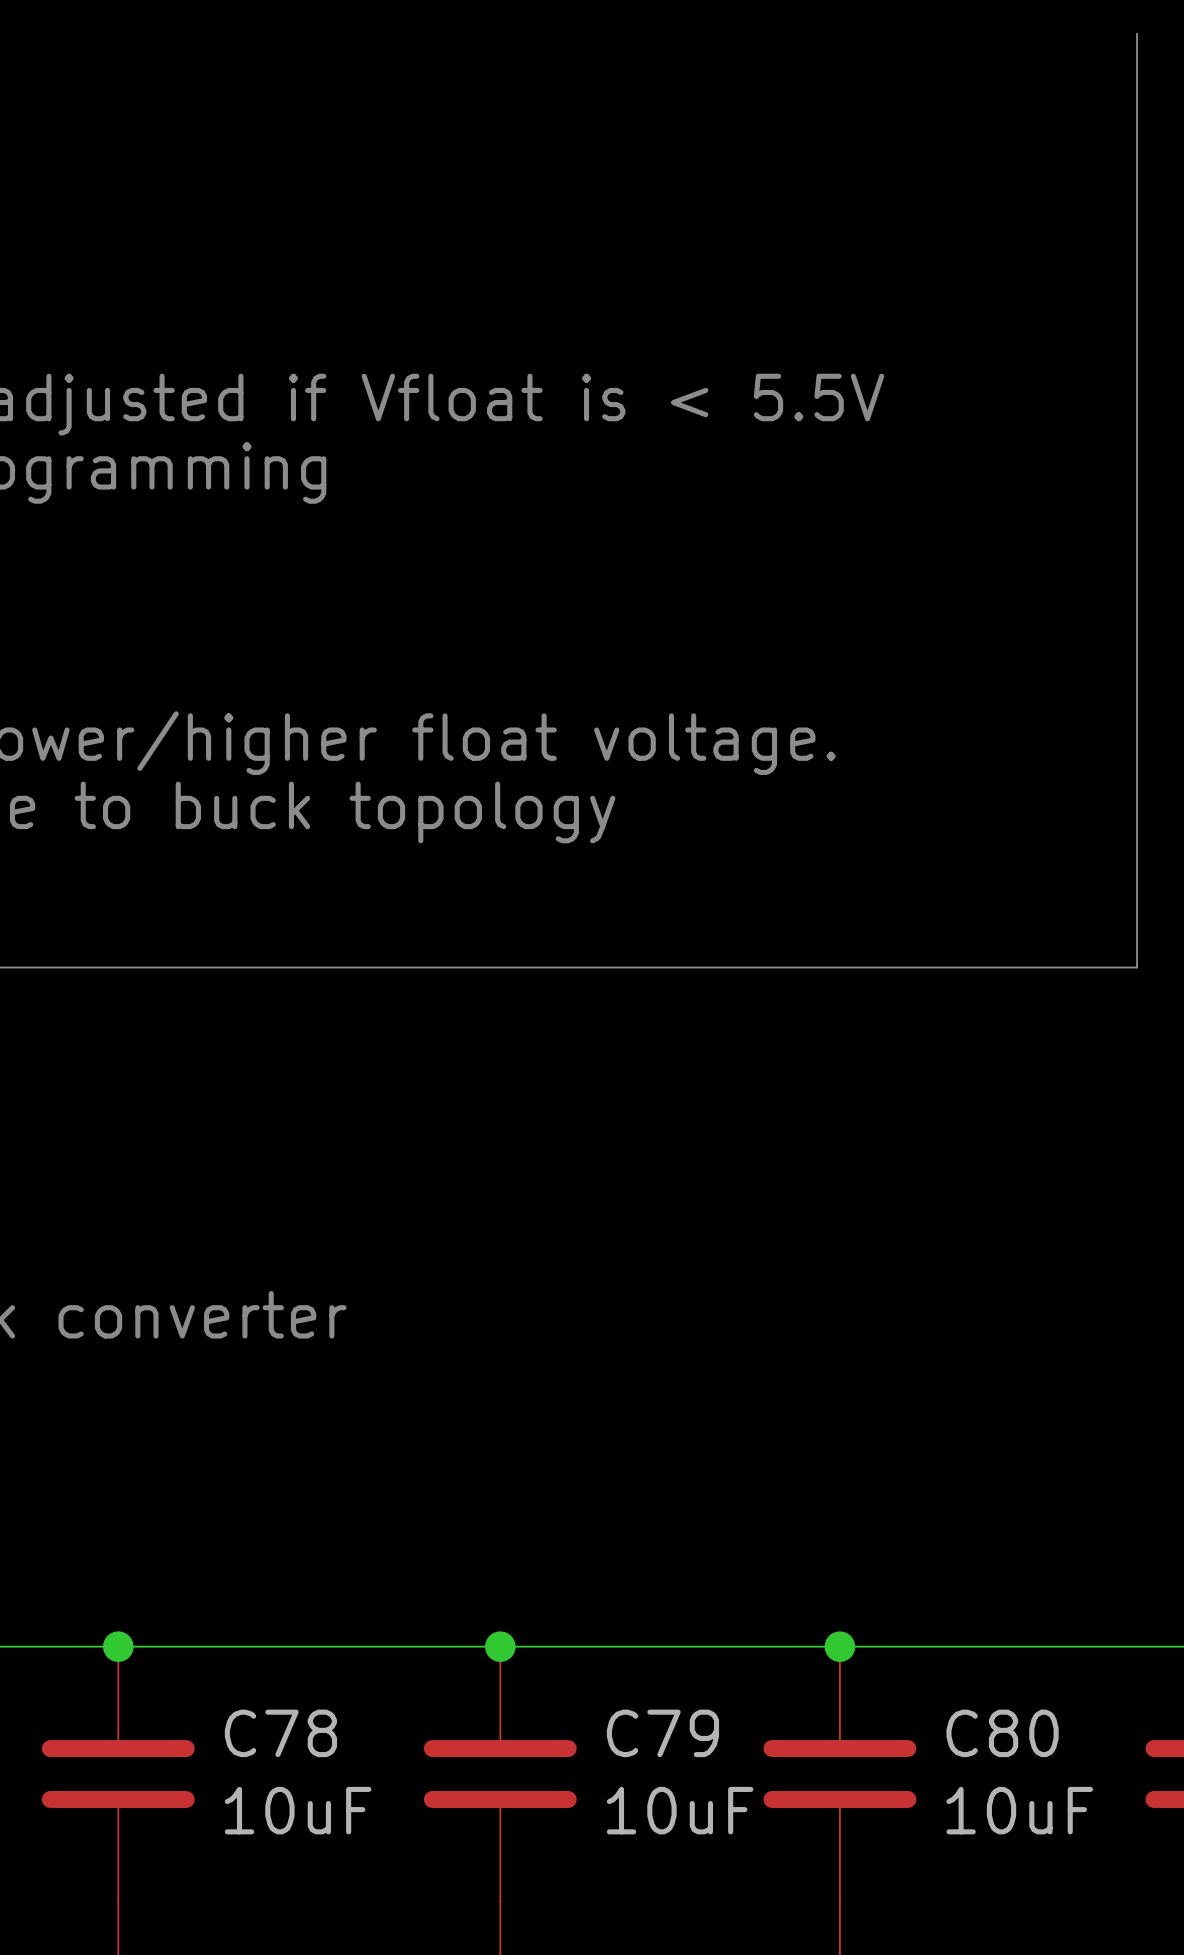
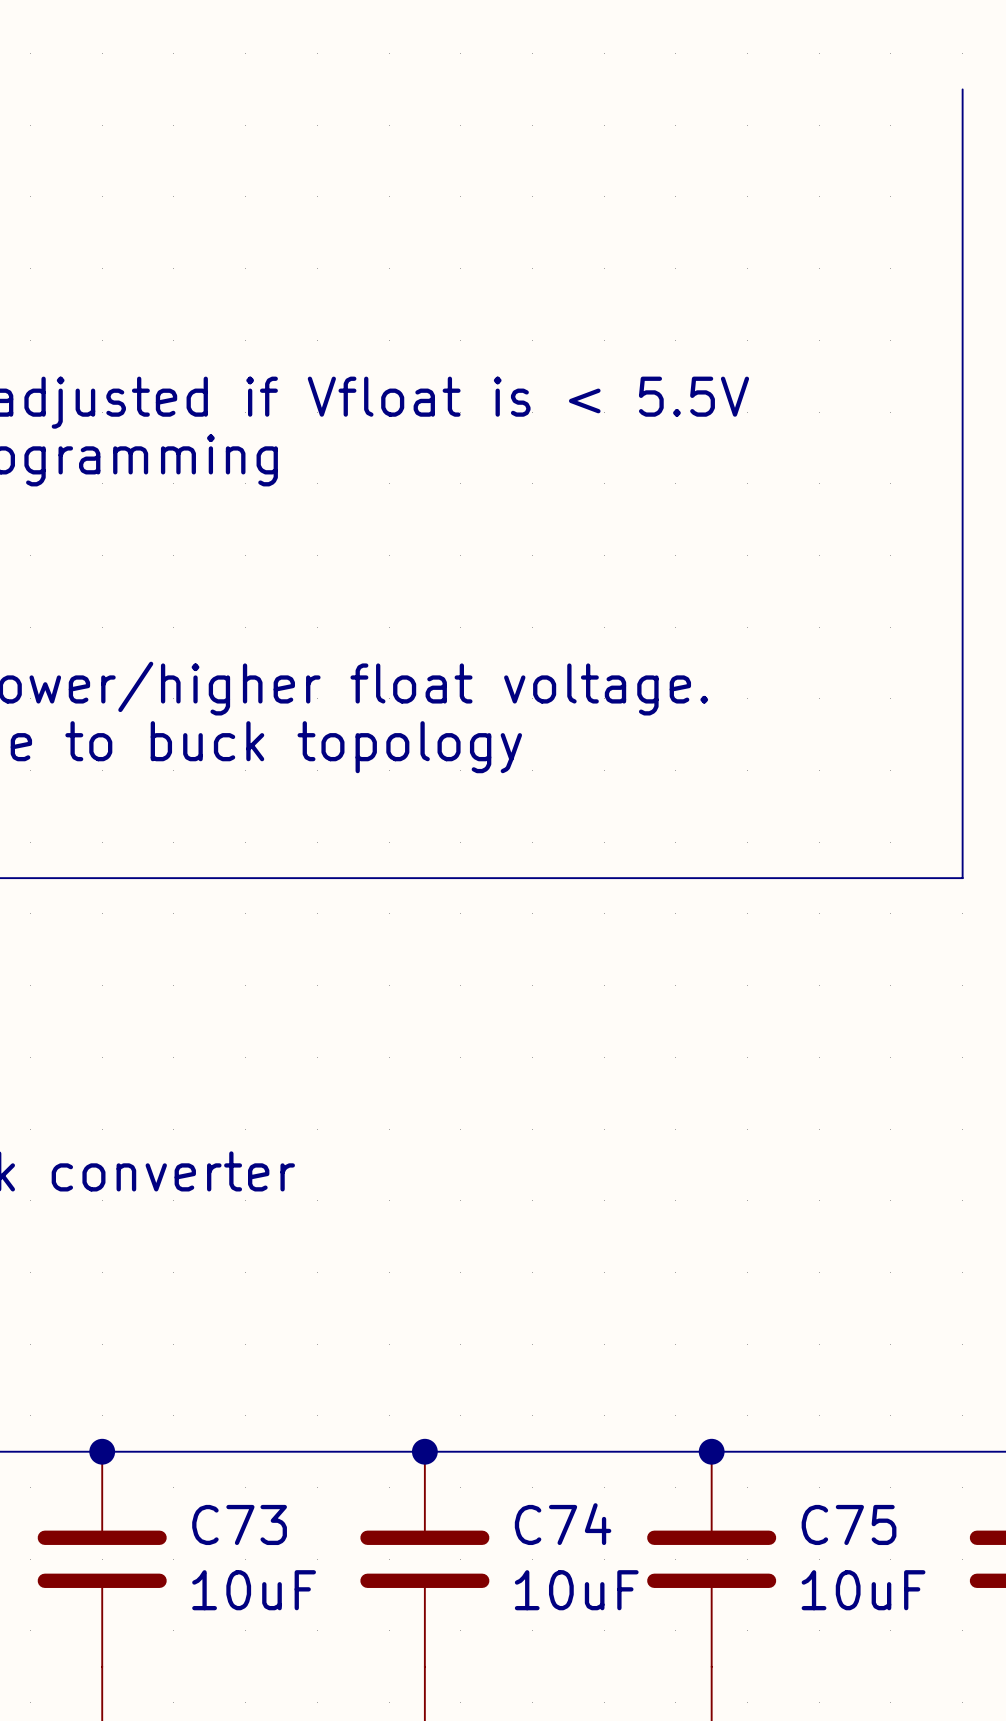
C78 name: C78 (280, 1733) -> C73 (239, 1524)
C79 name: C79 (662, 1733) -> C74 (563, 1524)
C80 name: C80 (1002, 1733) -> C75 (849, 1524)

